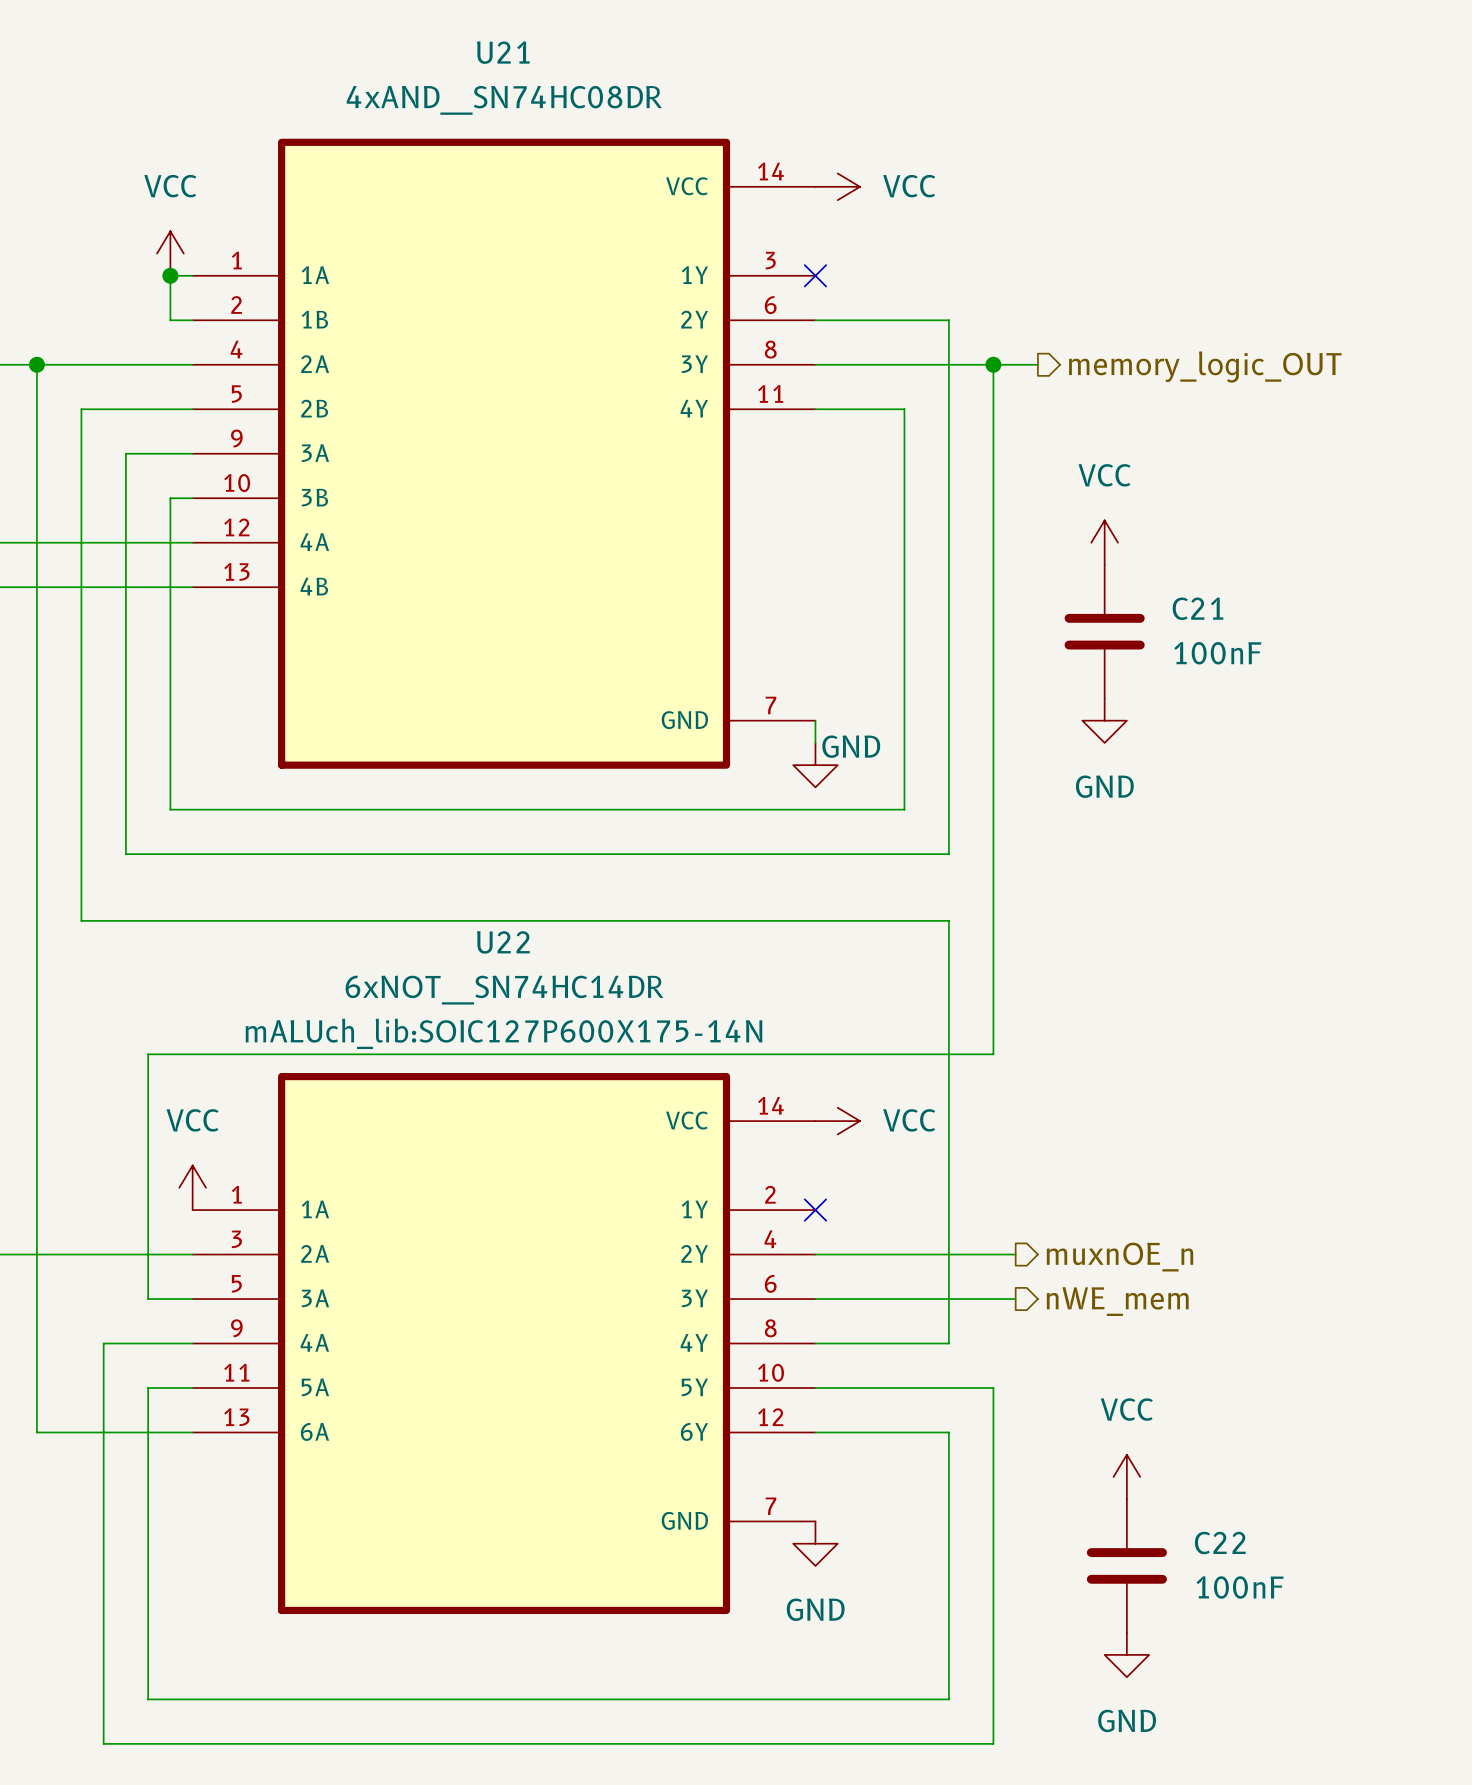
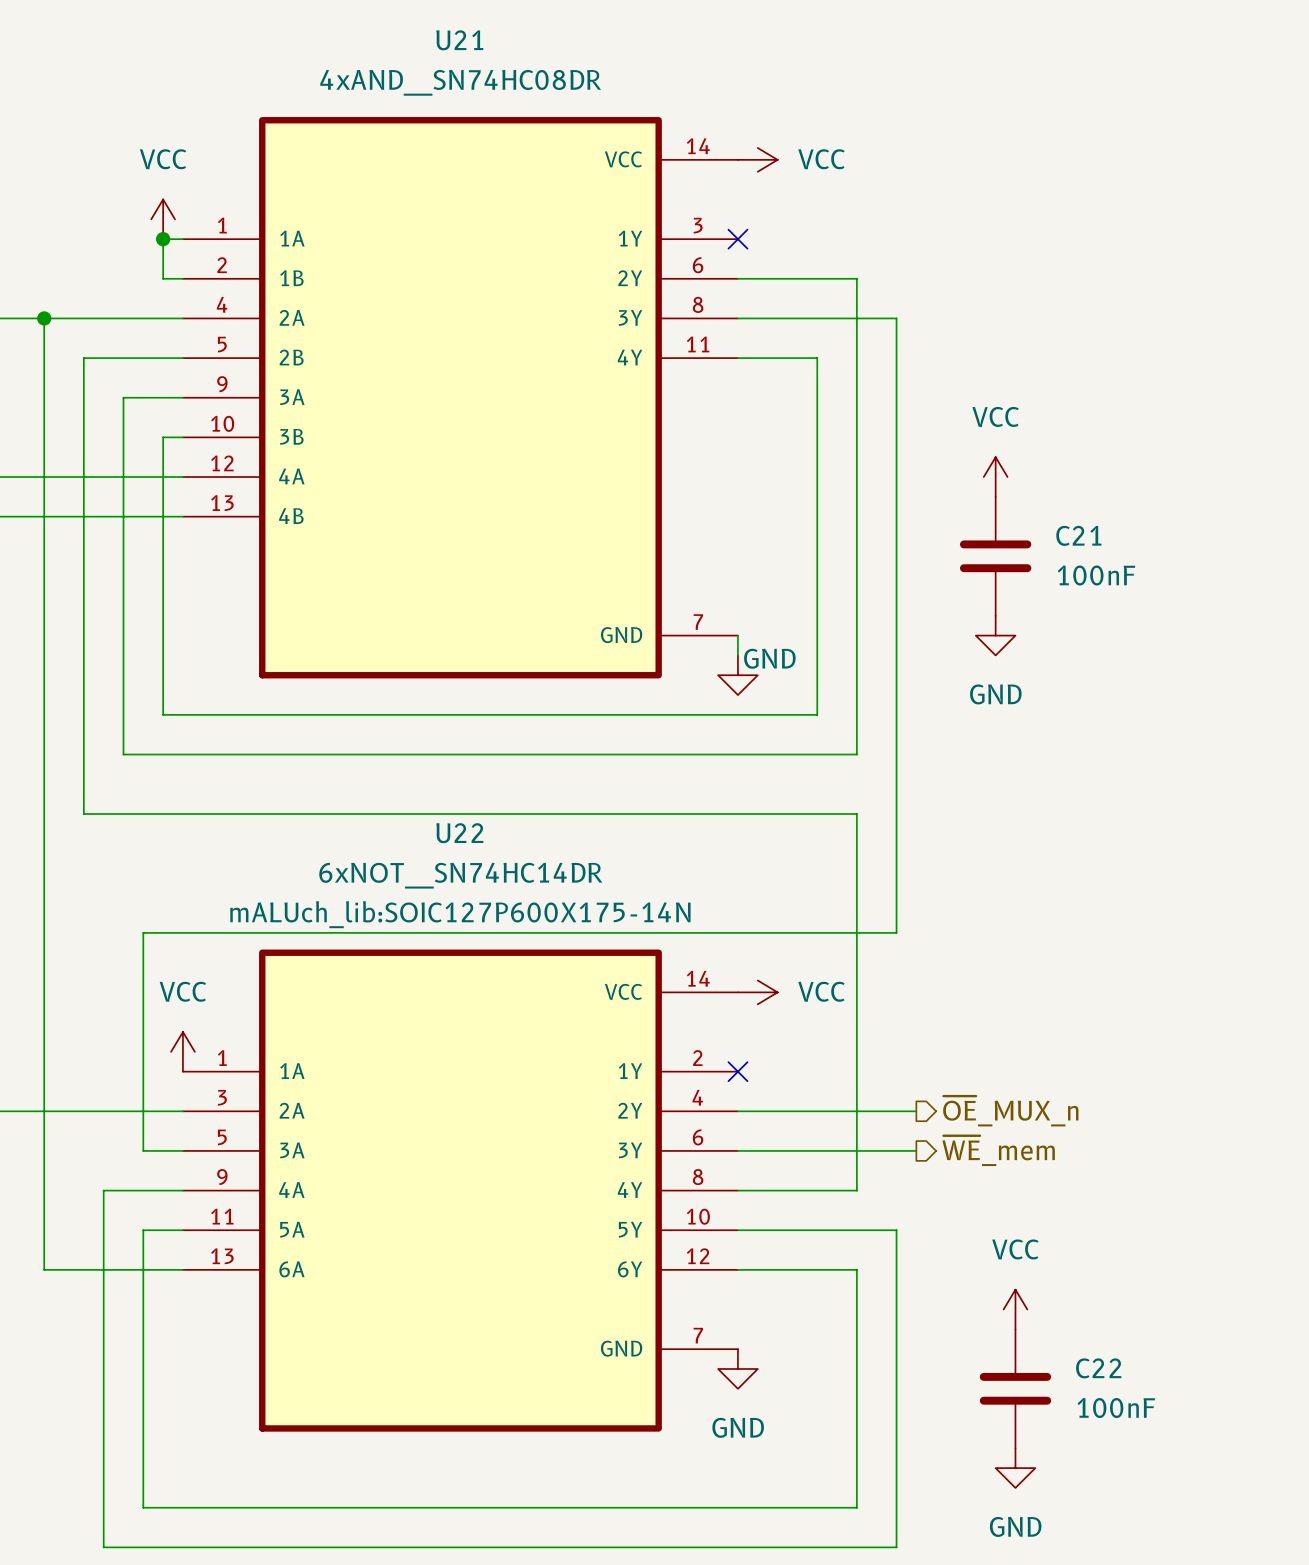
wire: (993, 364) (1037, 364) -> none
junction: (993, 364) -> none
hierarchical label: memory_logic_OUT (1205, 366) -> none
hierarchical label: muxnOE_n (1120, 1257) -> ~{OE}_MUX_n (1010, 1111)
hierarchical label: nWE_mem (1117, 1301) -> ~{WE}_mem (998, 1150)

